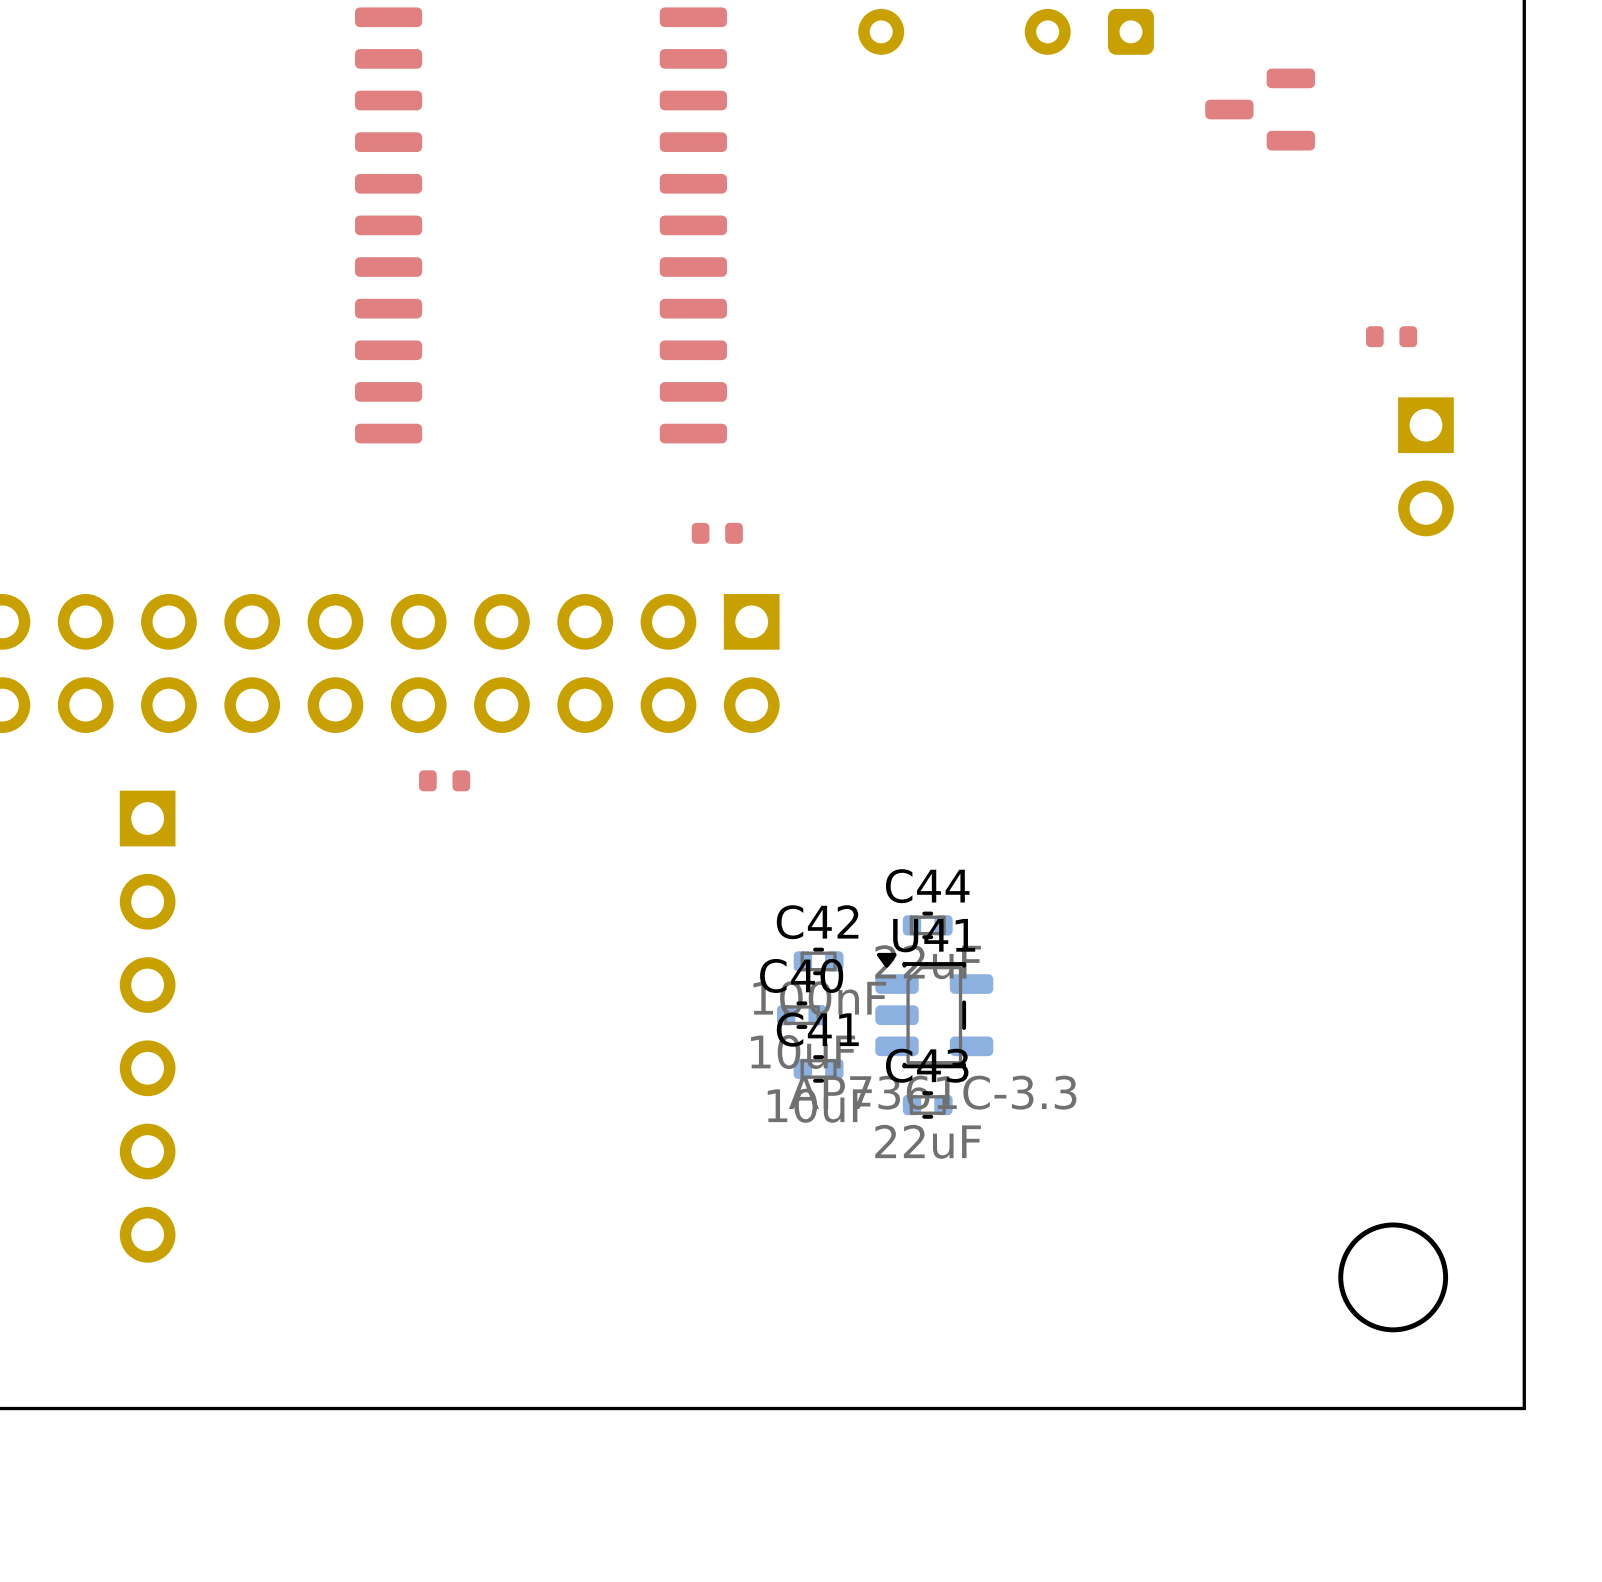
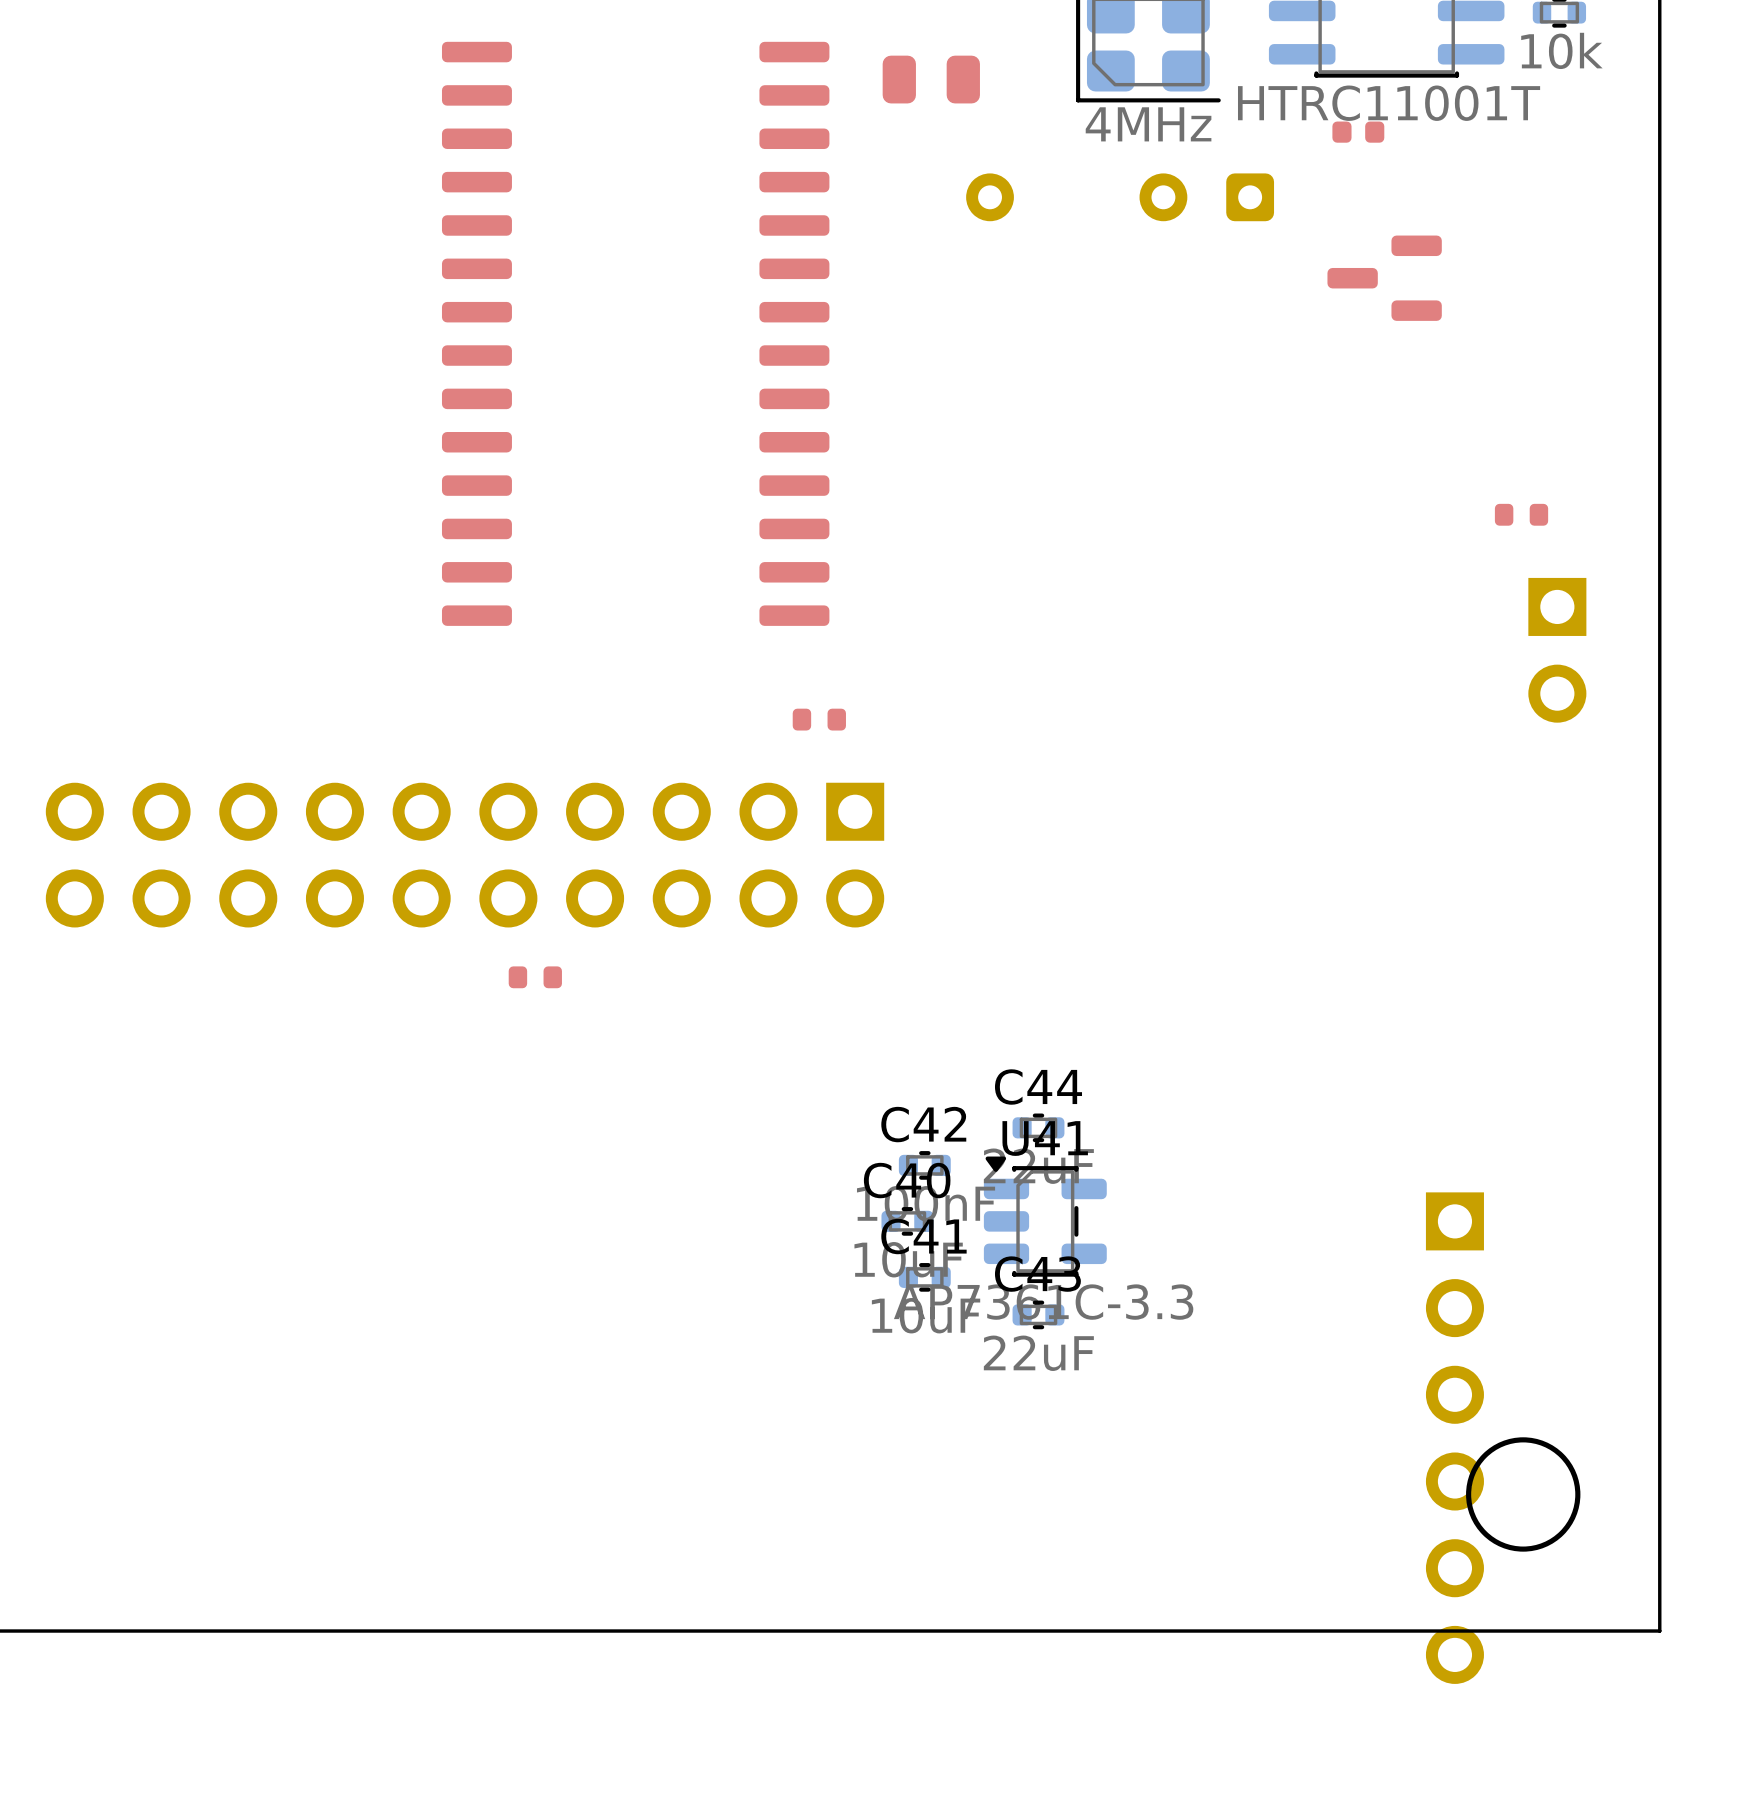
part: (147, 1026) -> none
part: none -> (1454, 1438)

